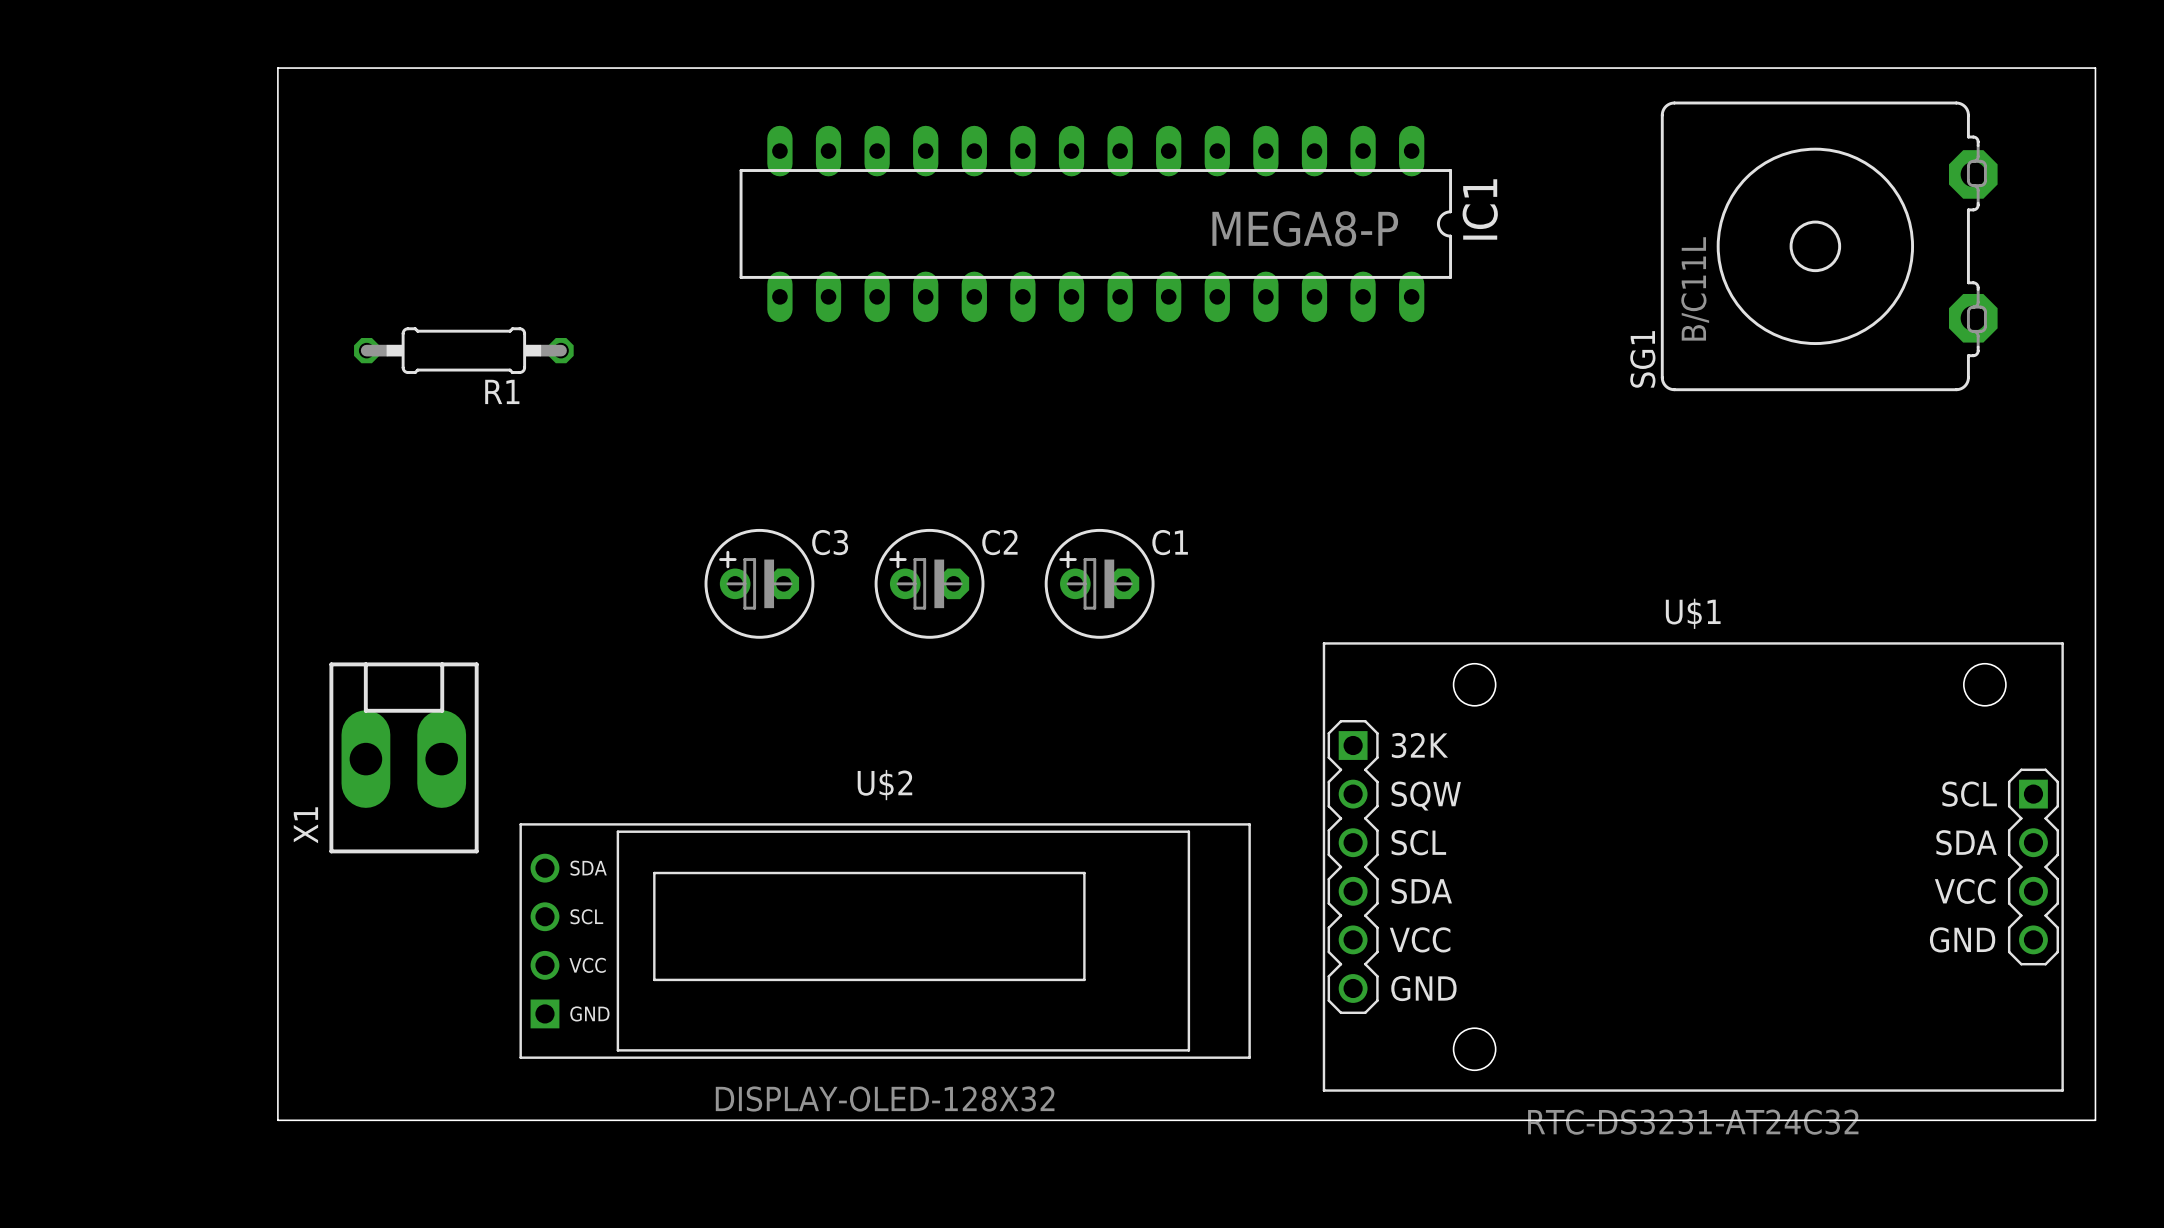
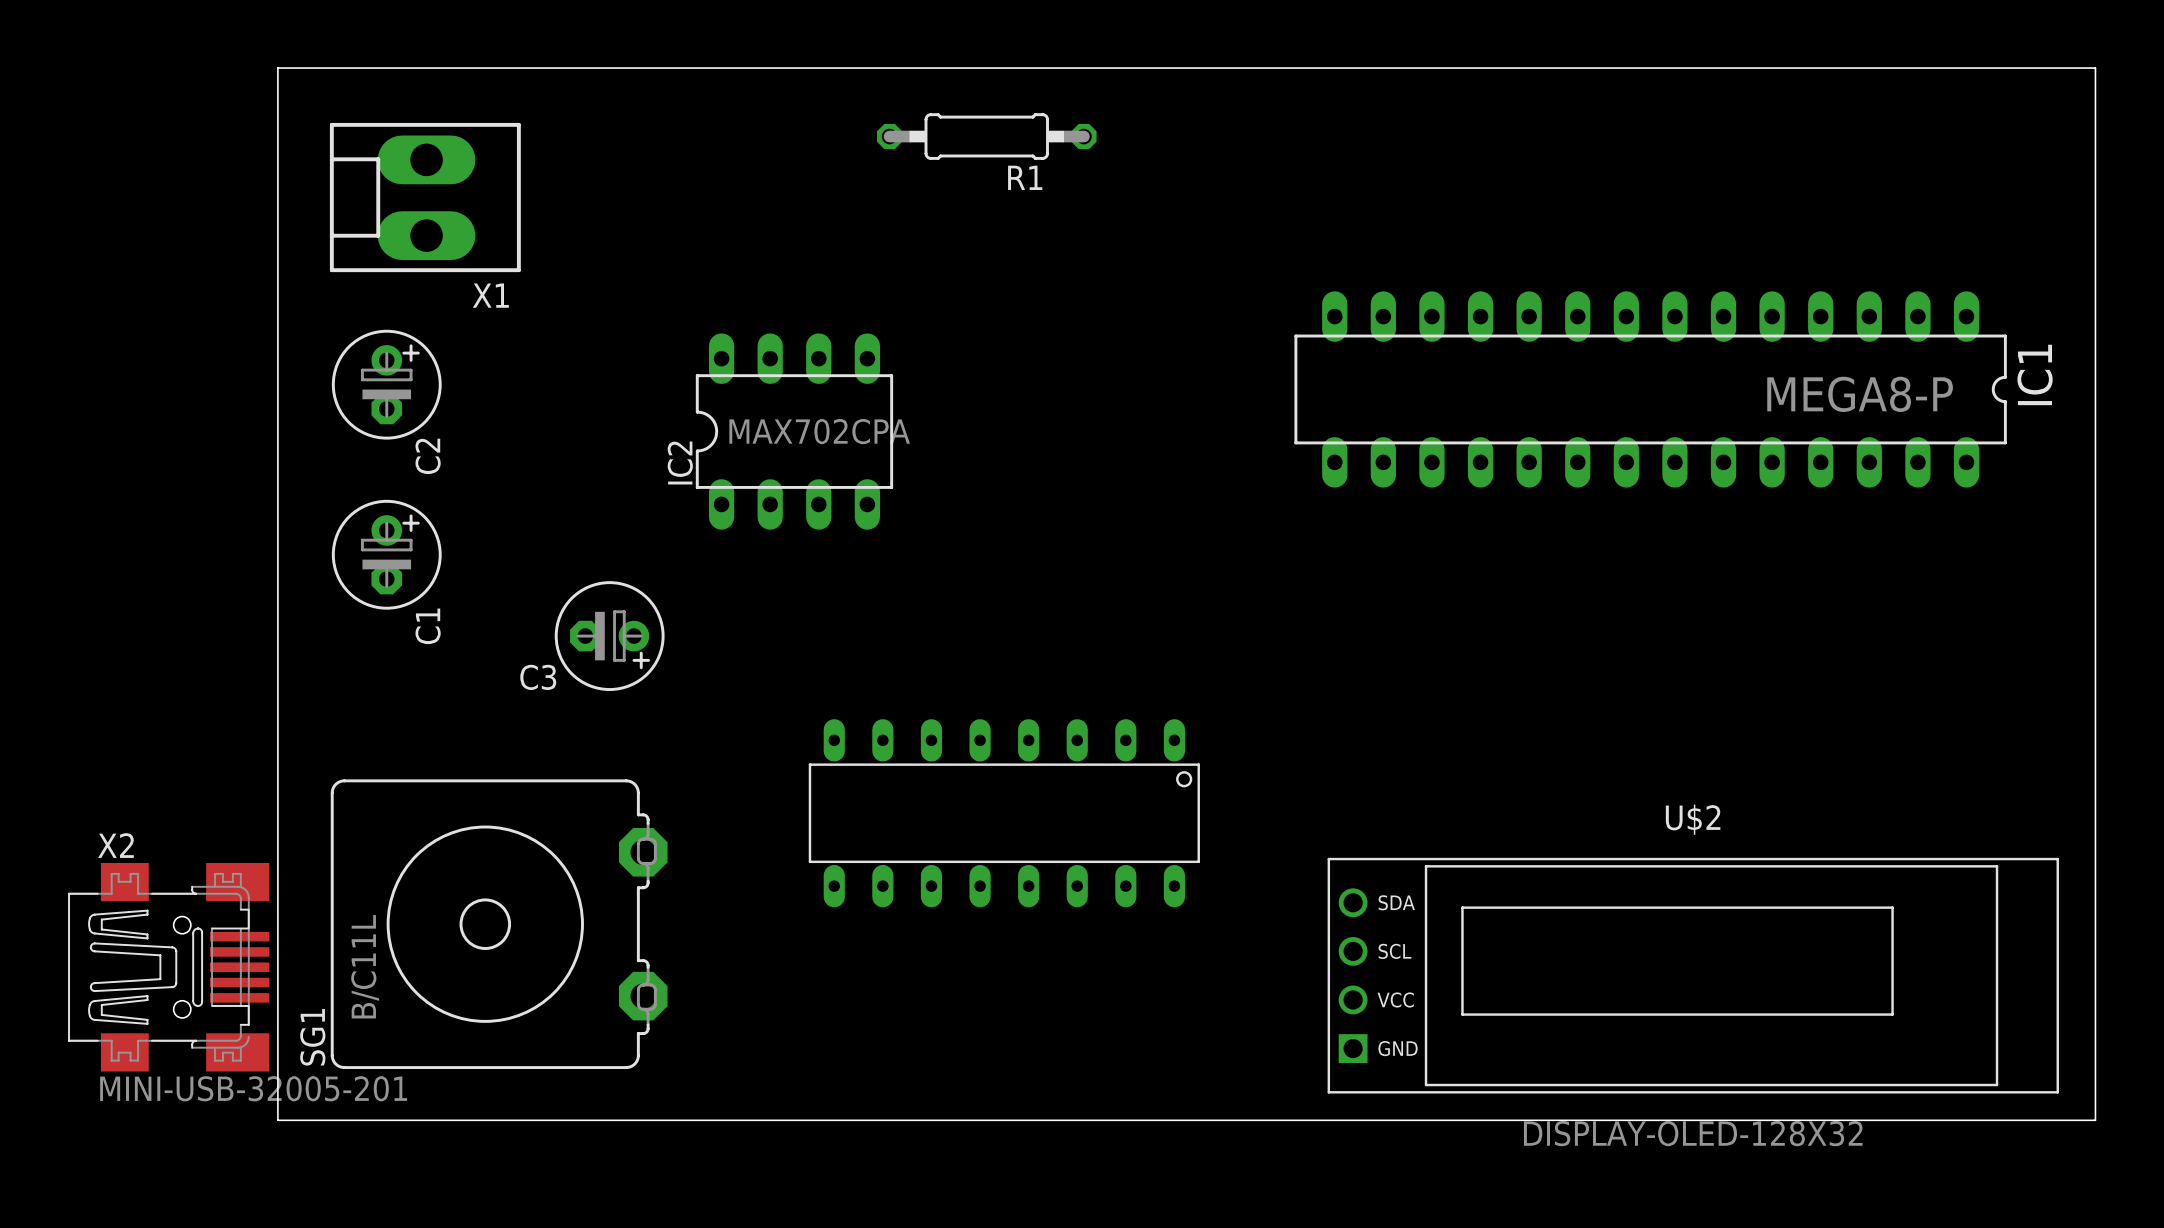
IC1 position: (1095, 223) -> (1650, 389)
SG1 position: (1829, 246) -> (499, 924)
R1 position: (463, 350) -> (986, 136)
IC2: none -> MAX702CPA (794, 431)
C3 rotation: 0° (759, 583) -> 180° (609, 636)
C3 position: (759, 583) -> (609, 636)
C2 rotation: 0° (929, 583) -> 90° clockwise (386, 384)
C2 position: (929, 583) -> (386, 384)
C1 rotation: 0° (1099, 583) -> 90° clockwise (386, 554)
C1 position: (1099, 583) -> (386, 554)
X1 rotation: 0° (404, 757) -> 90° counterclockwise (425, 197)
X1 position: (404, 757) -> (425, 197)
part: none -> (1004, 813)
U$1: RTC-DS3231-AT24C32 (1693, 867) -> none
U$2 position: (885, 941) -> (1693, 975)
X2: none -> MINI-USB-32005-201 (168, 967)

